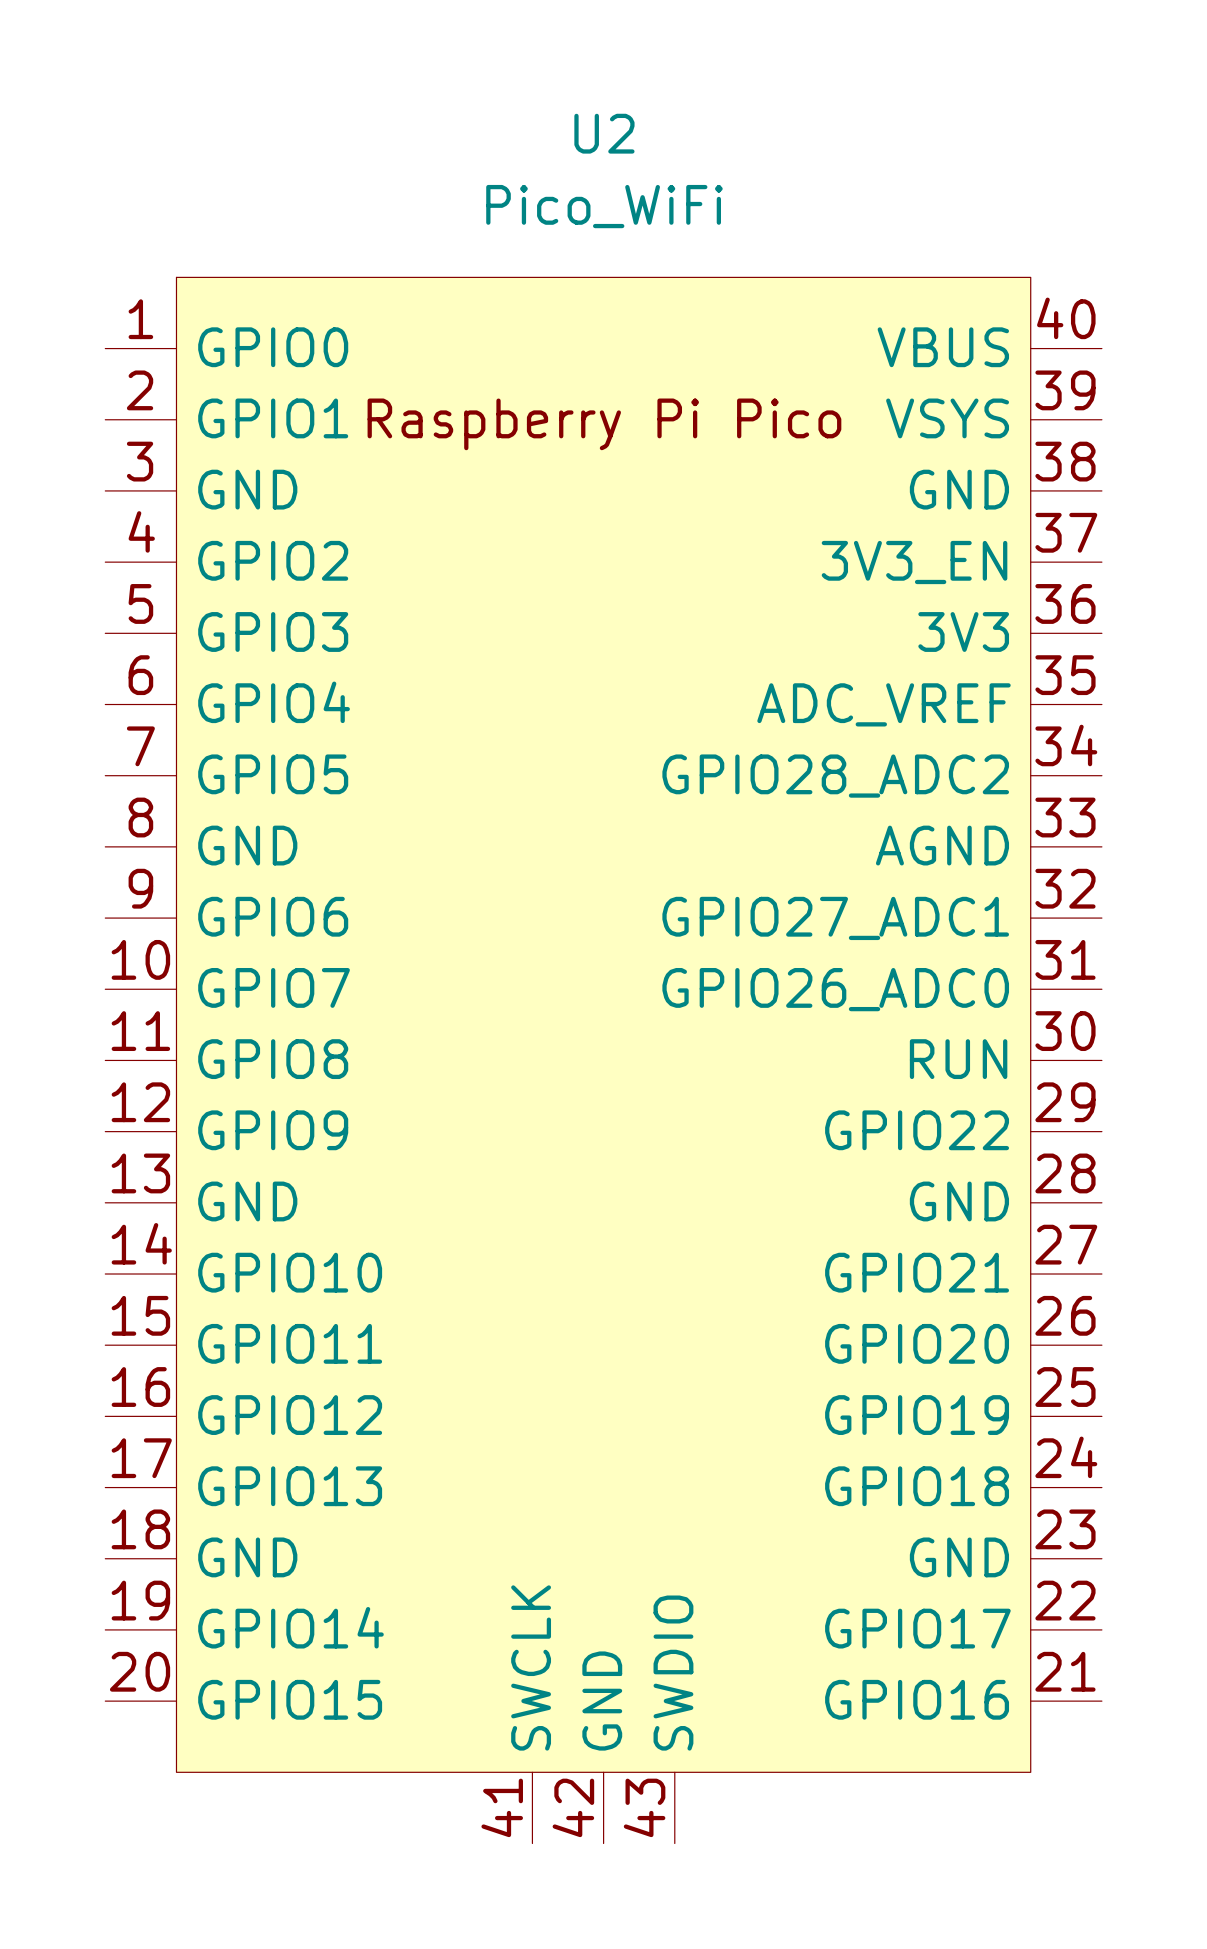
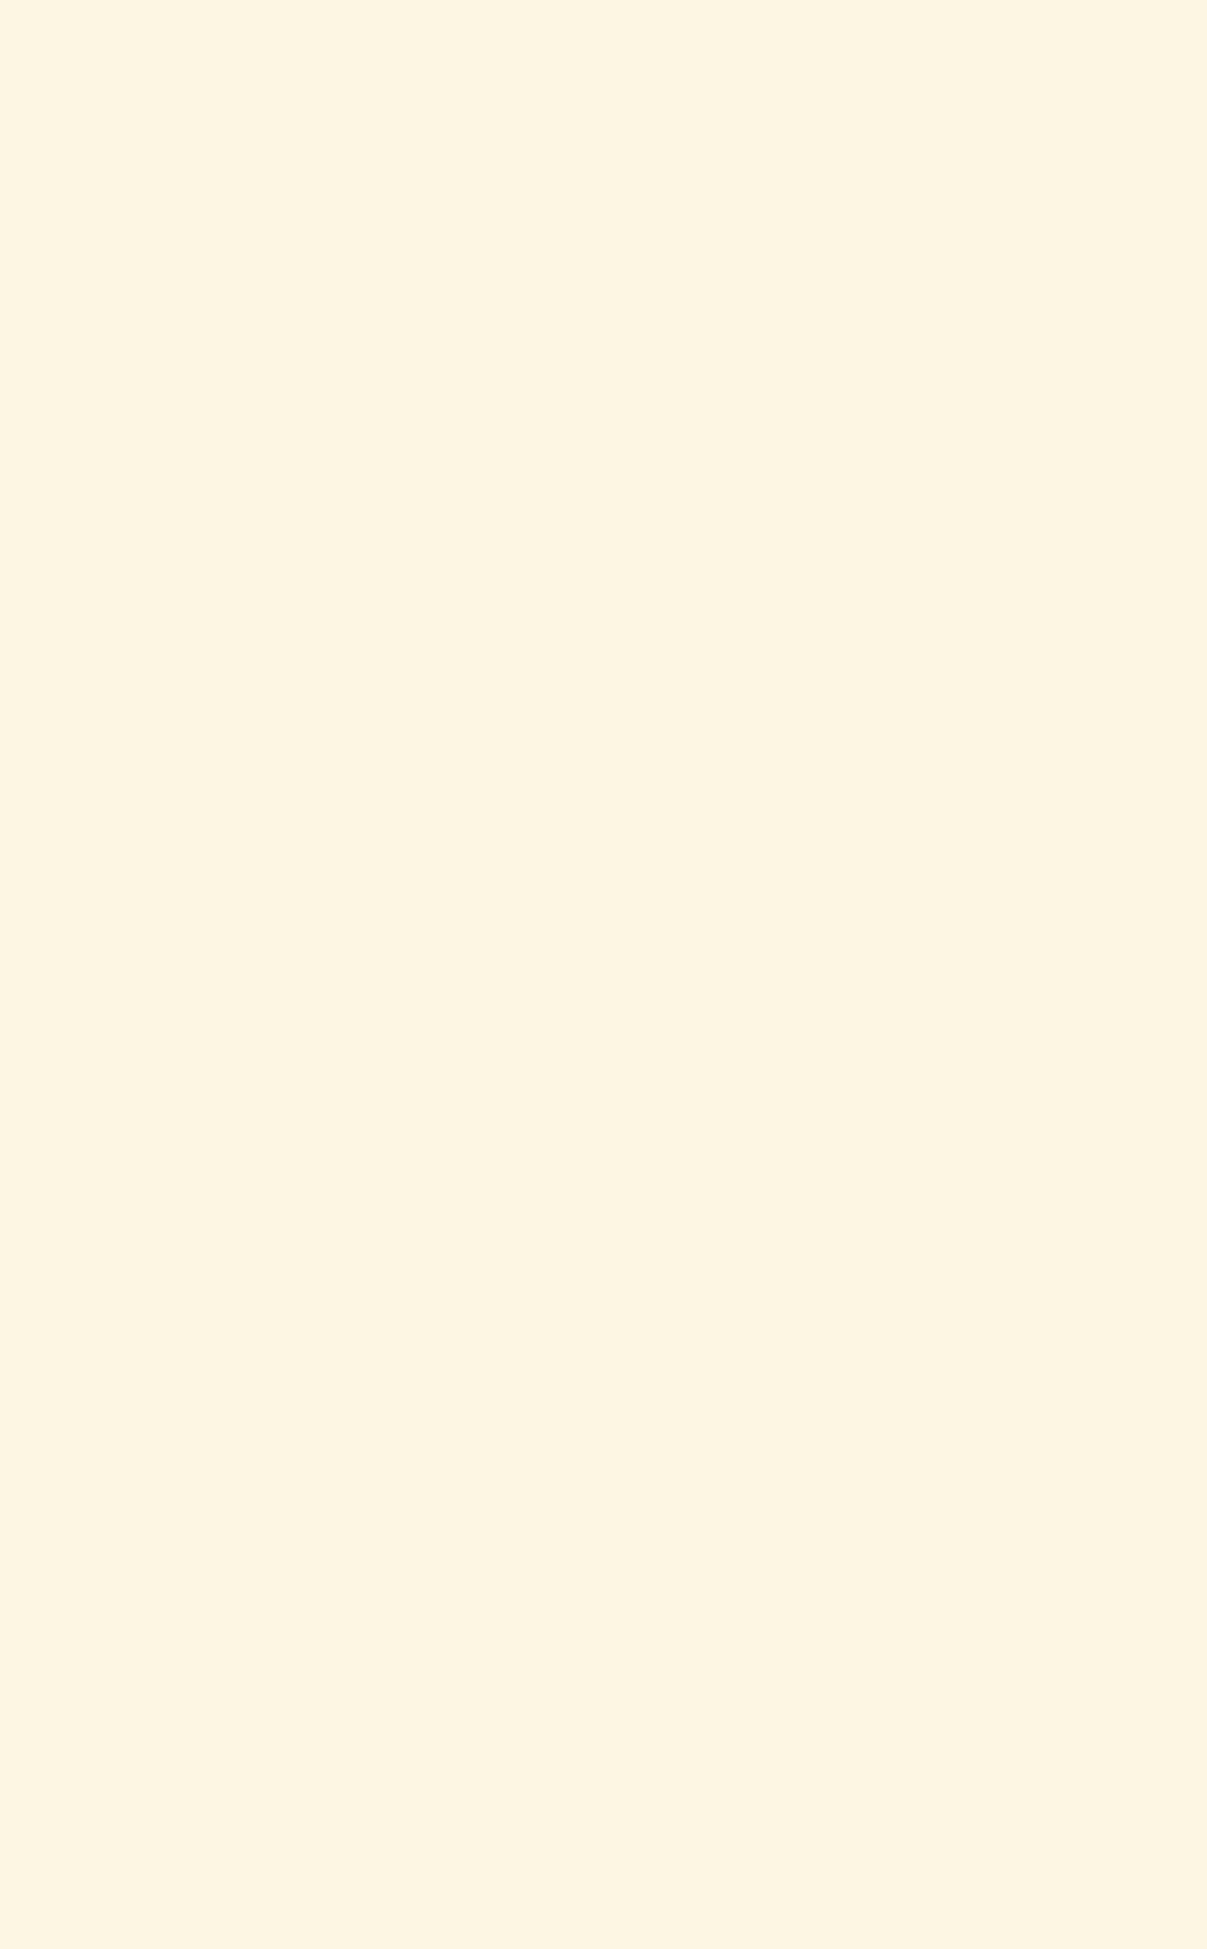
U2: Pico_WiFi (603, 1060) -> none

